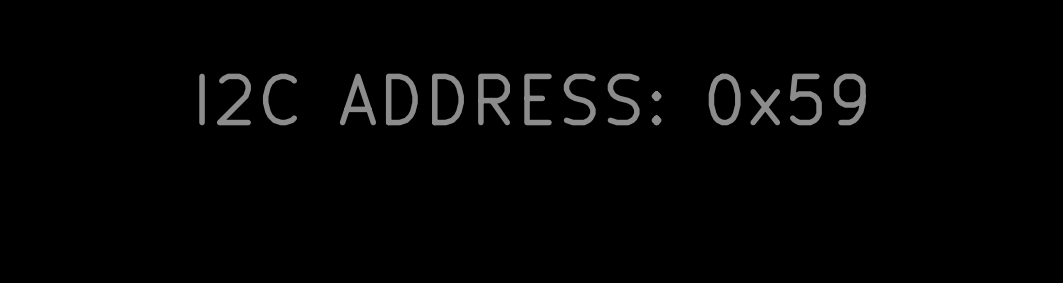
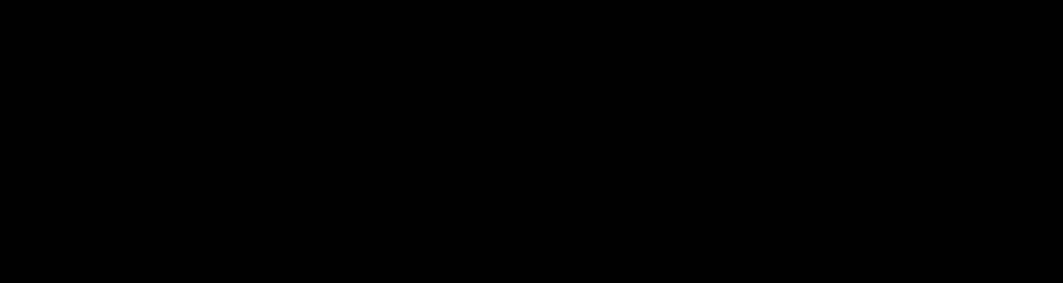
text: I2C ADDRESS: 0x59 (532, 99) -> none

